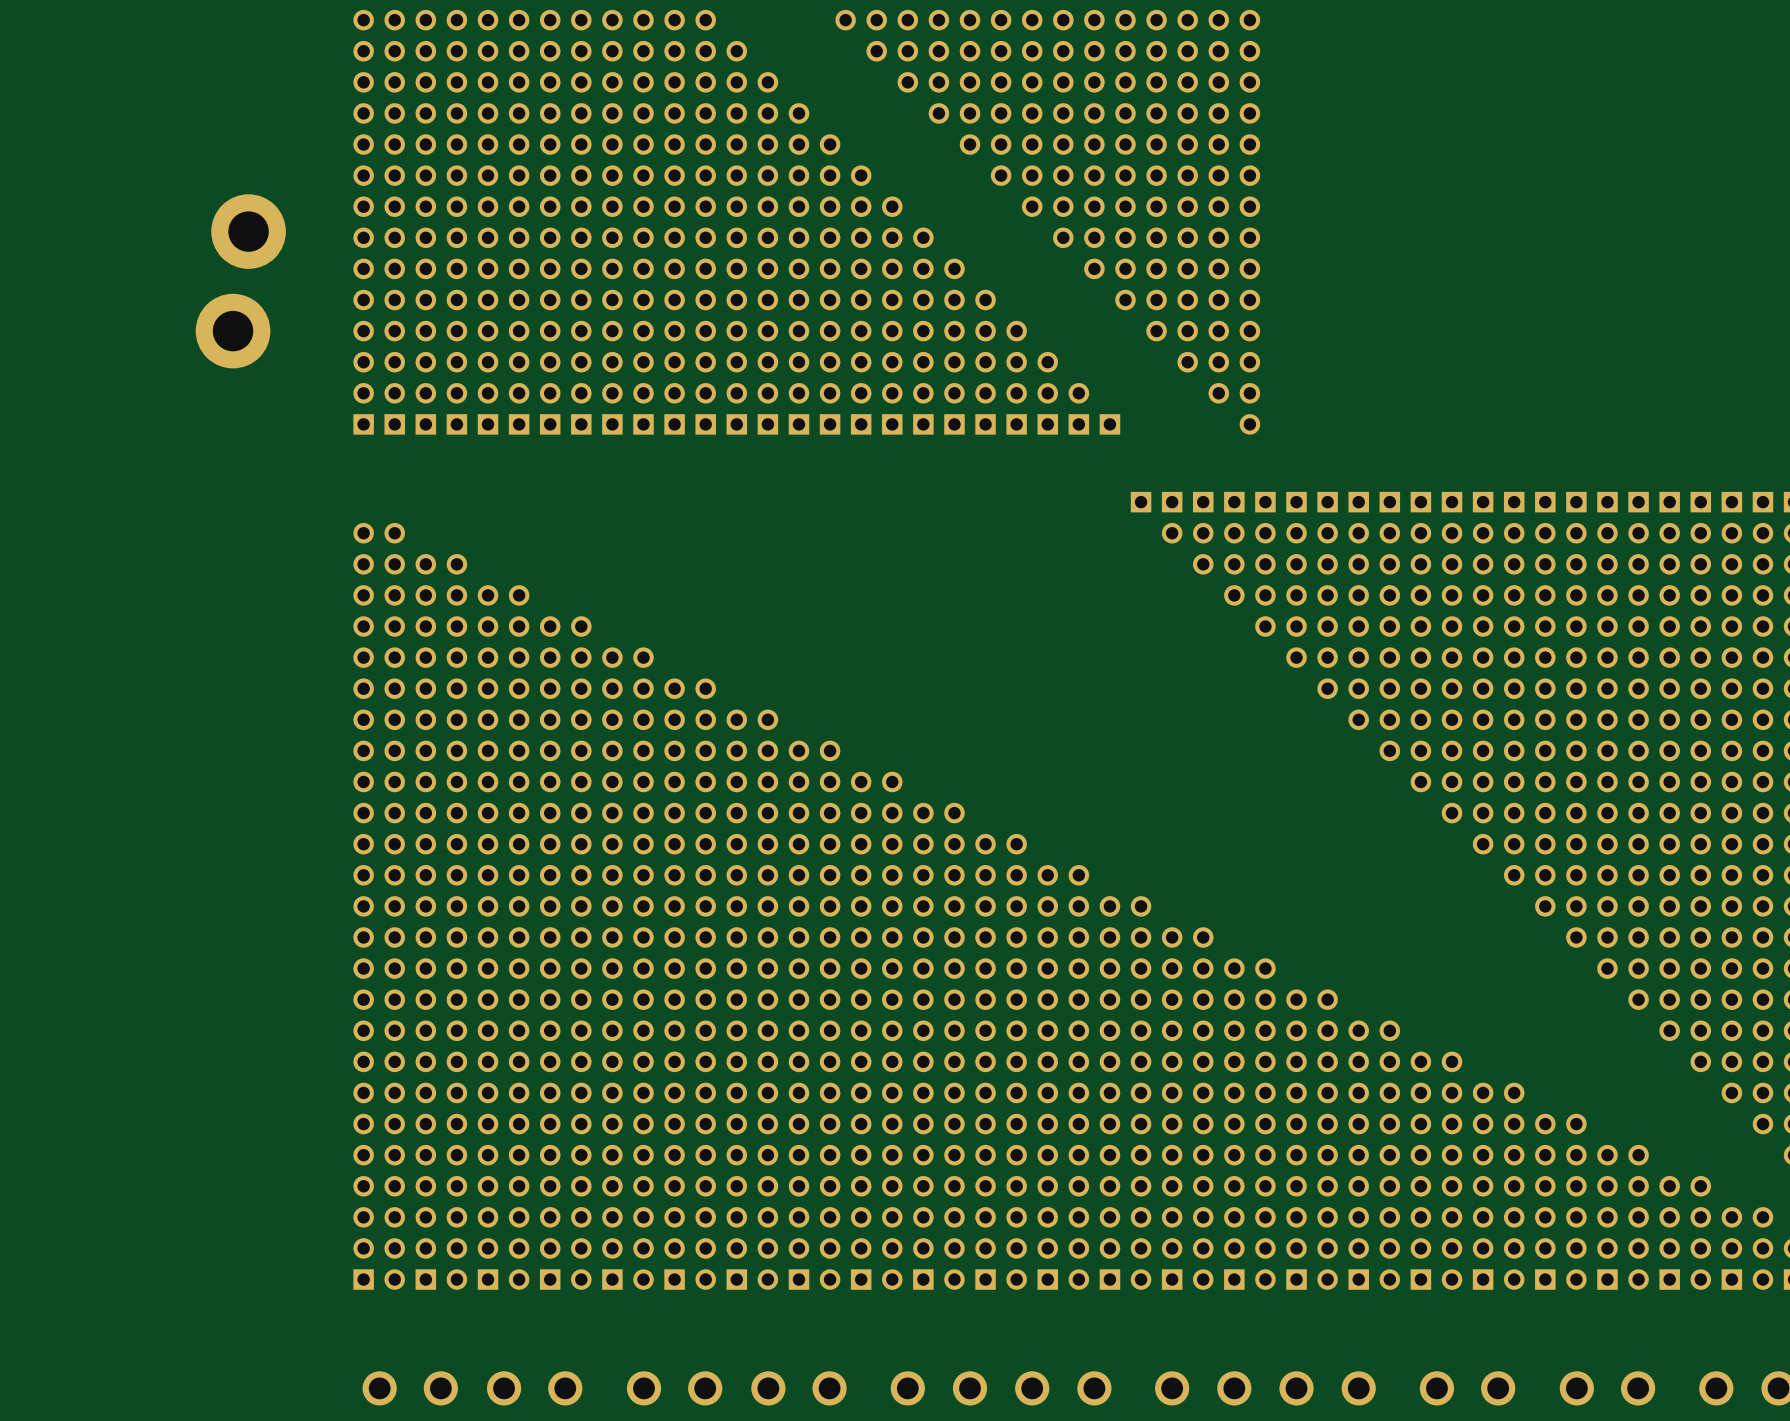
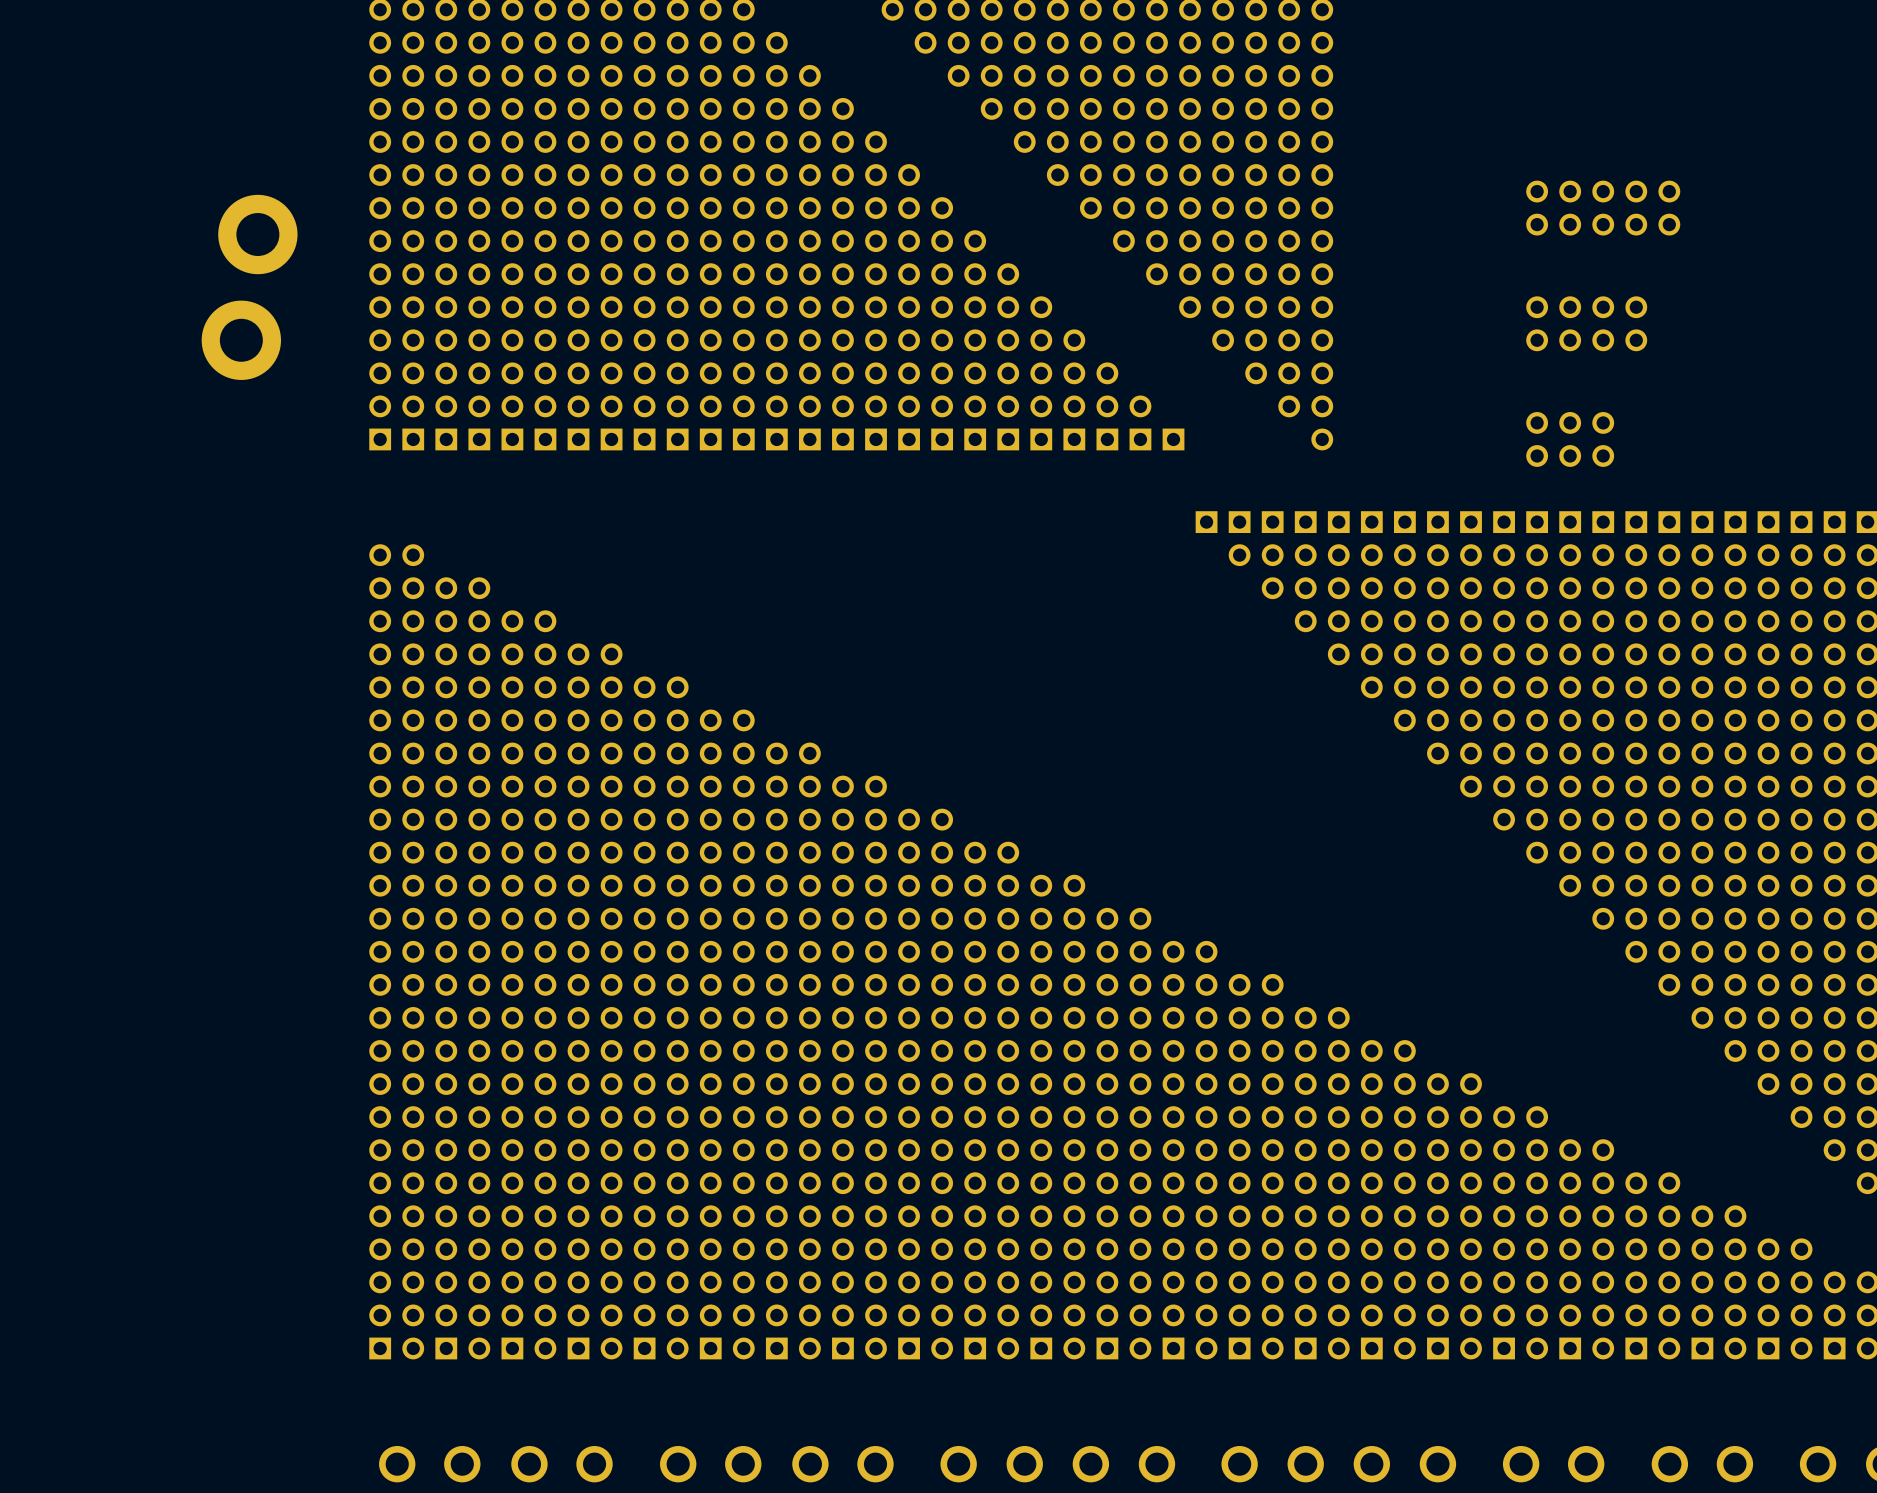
part: none -> (1603, 208)
part: none -> (1586, 323)
part: none -> (1570, 439)

